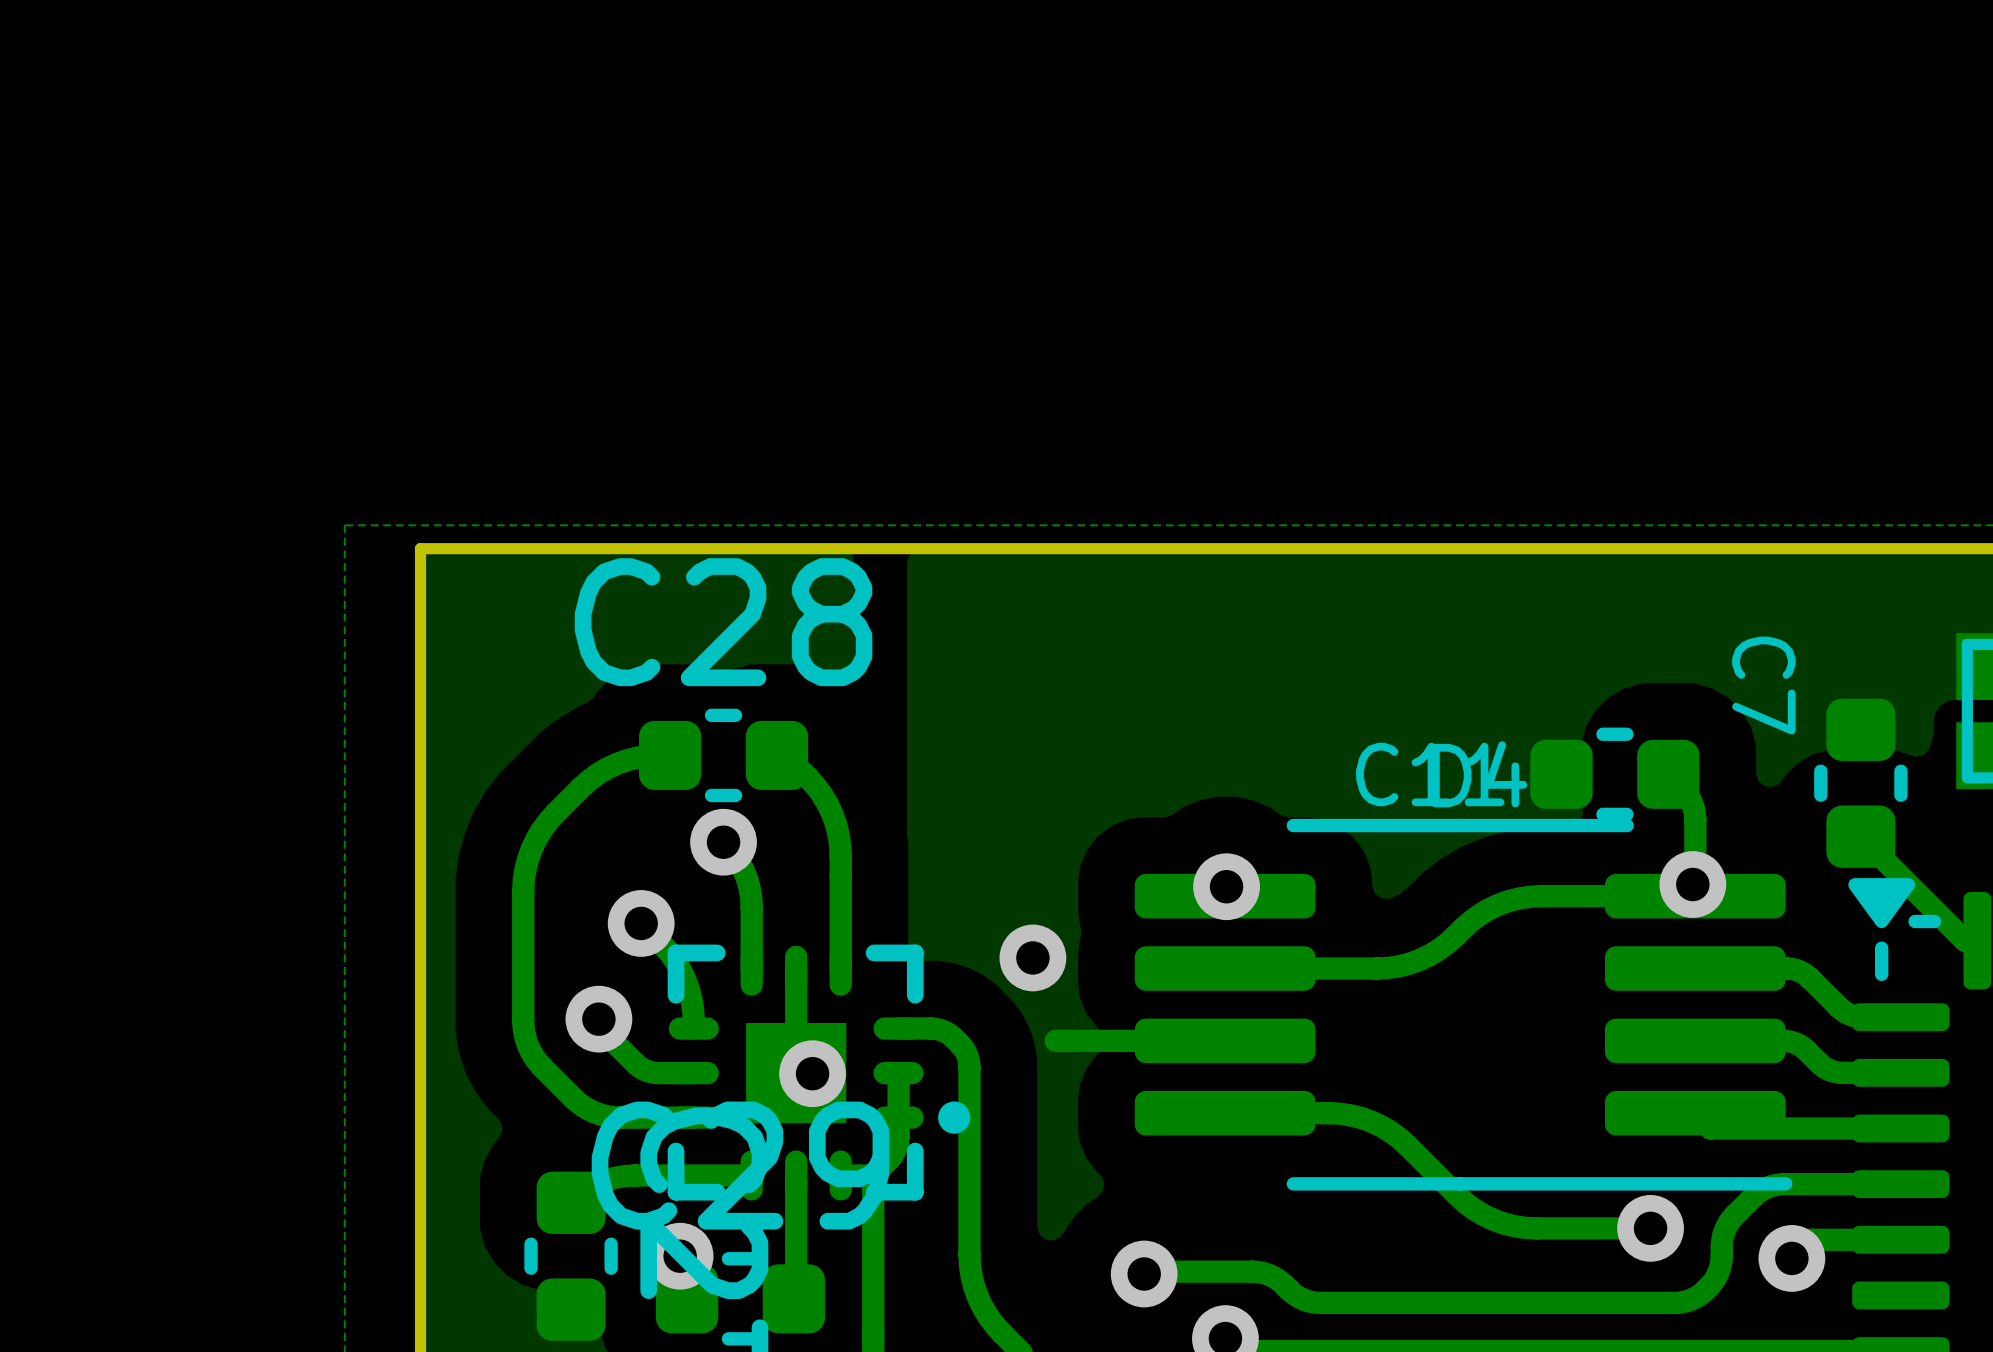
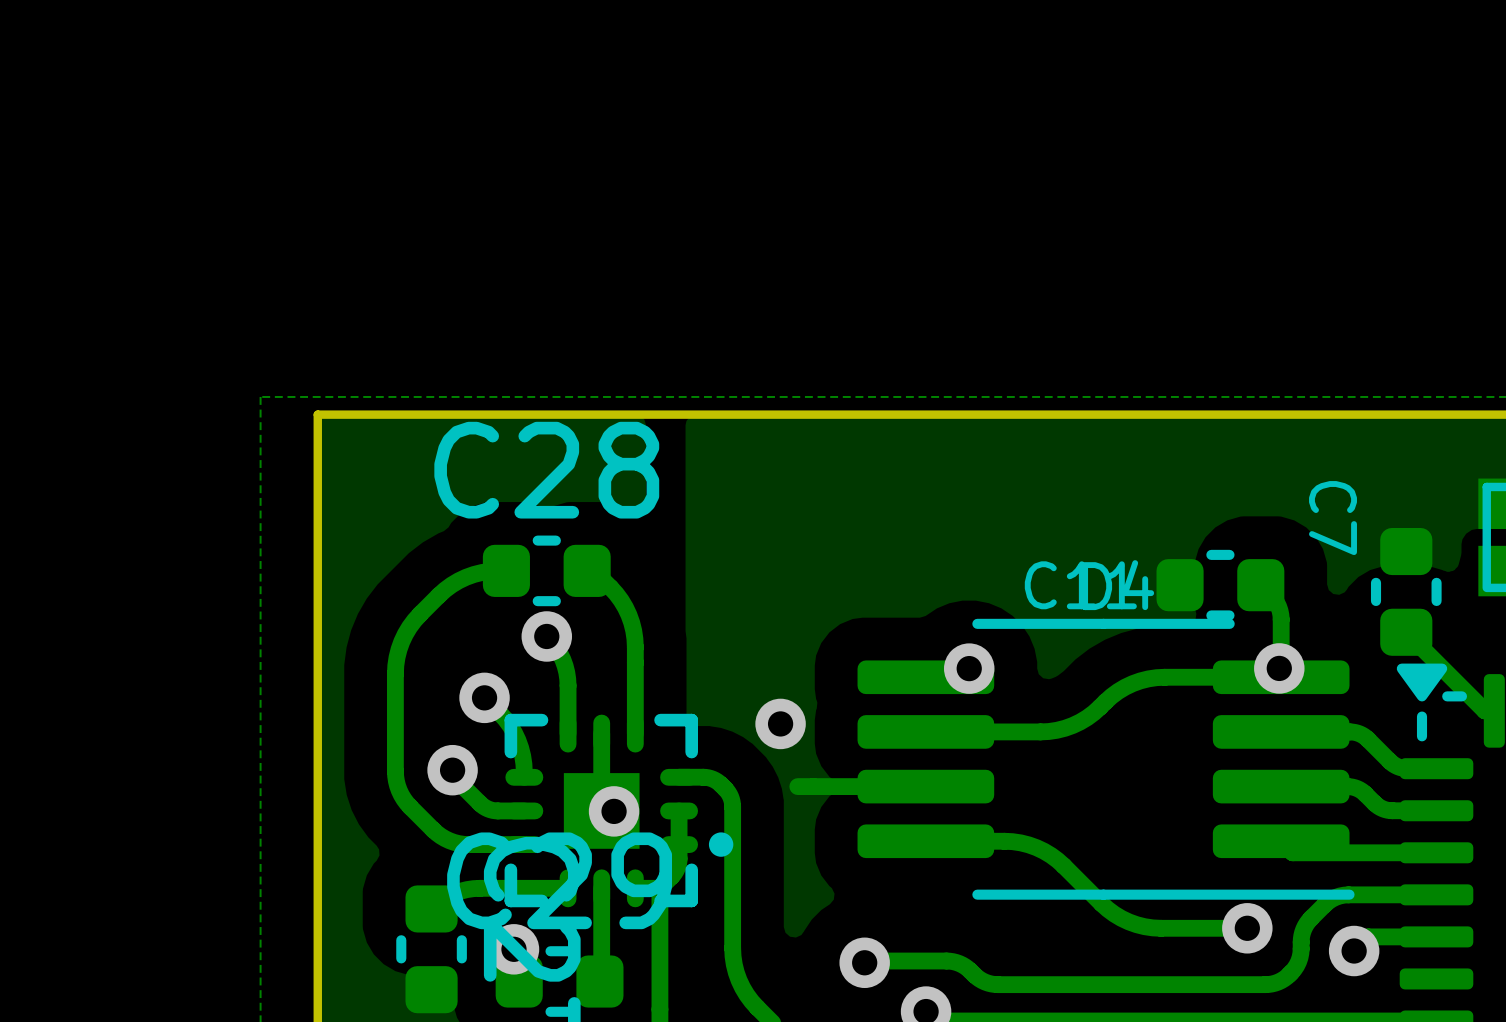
via position: (1226, 886) -> (969, 668)

